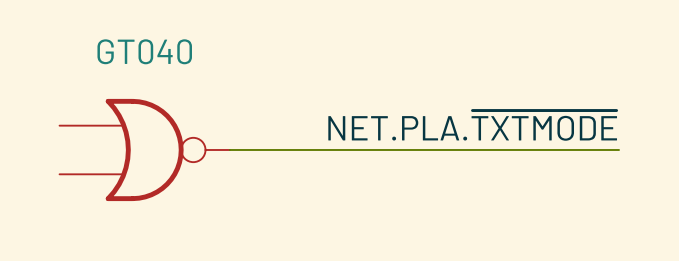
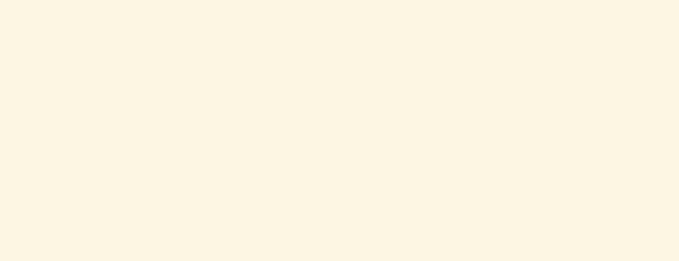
label: NET.PLA.~{TXTMODE} (472, 125) -> none
part: GT040 (144, 149) -> none
wire: (229, 149) (619, 149) -> none

